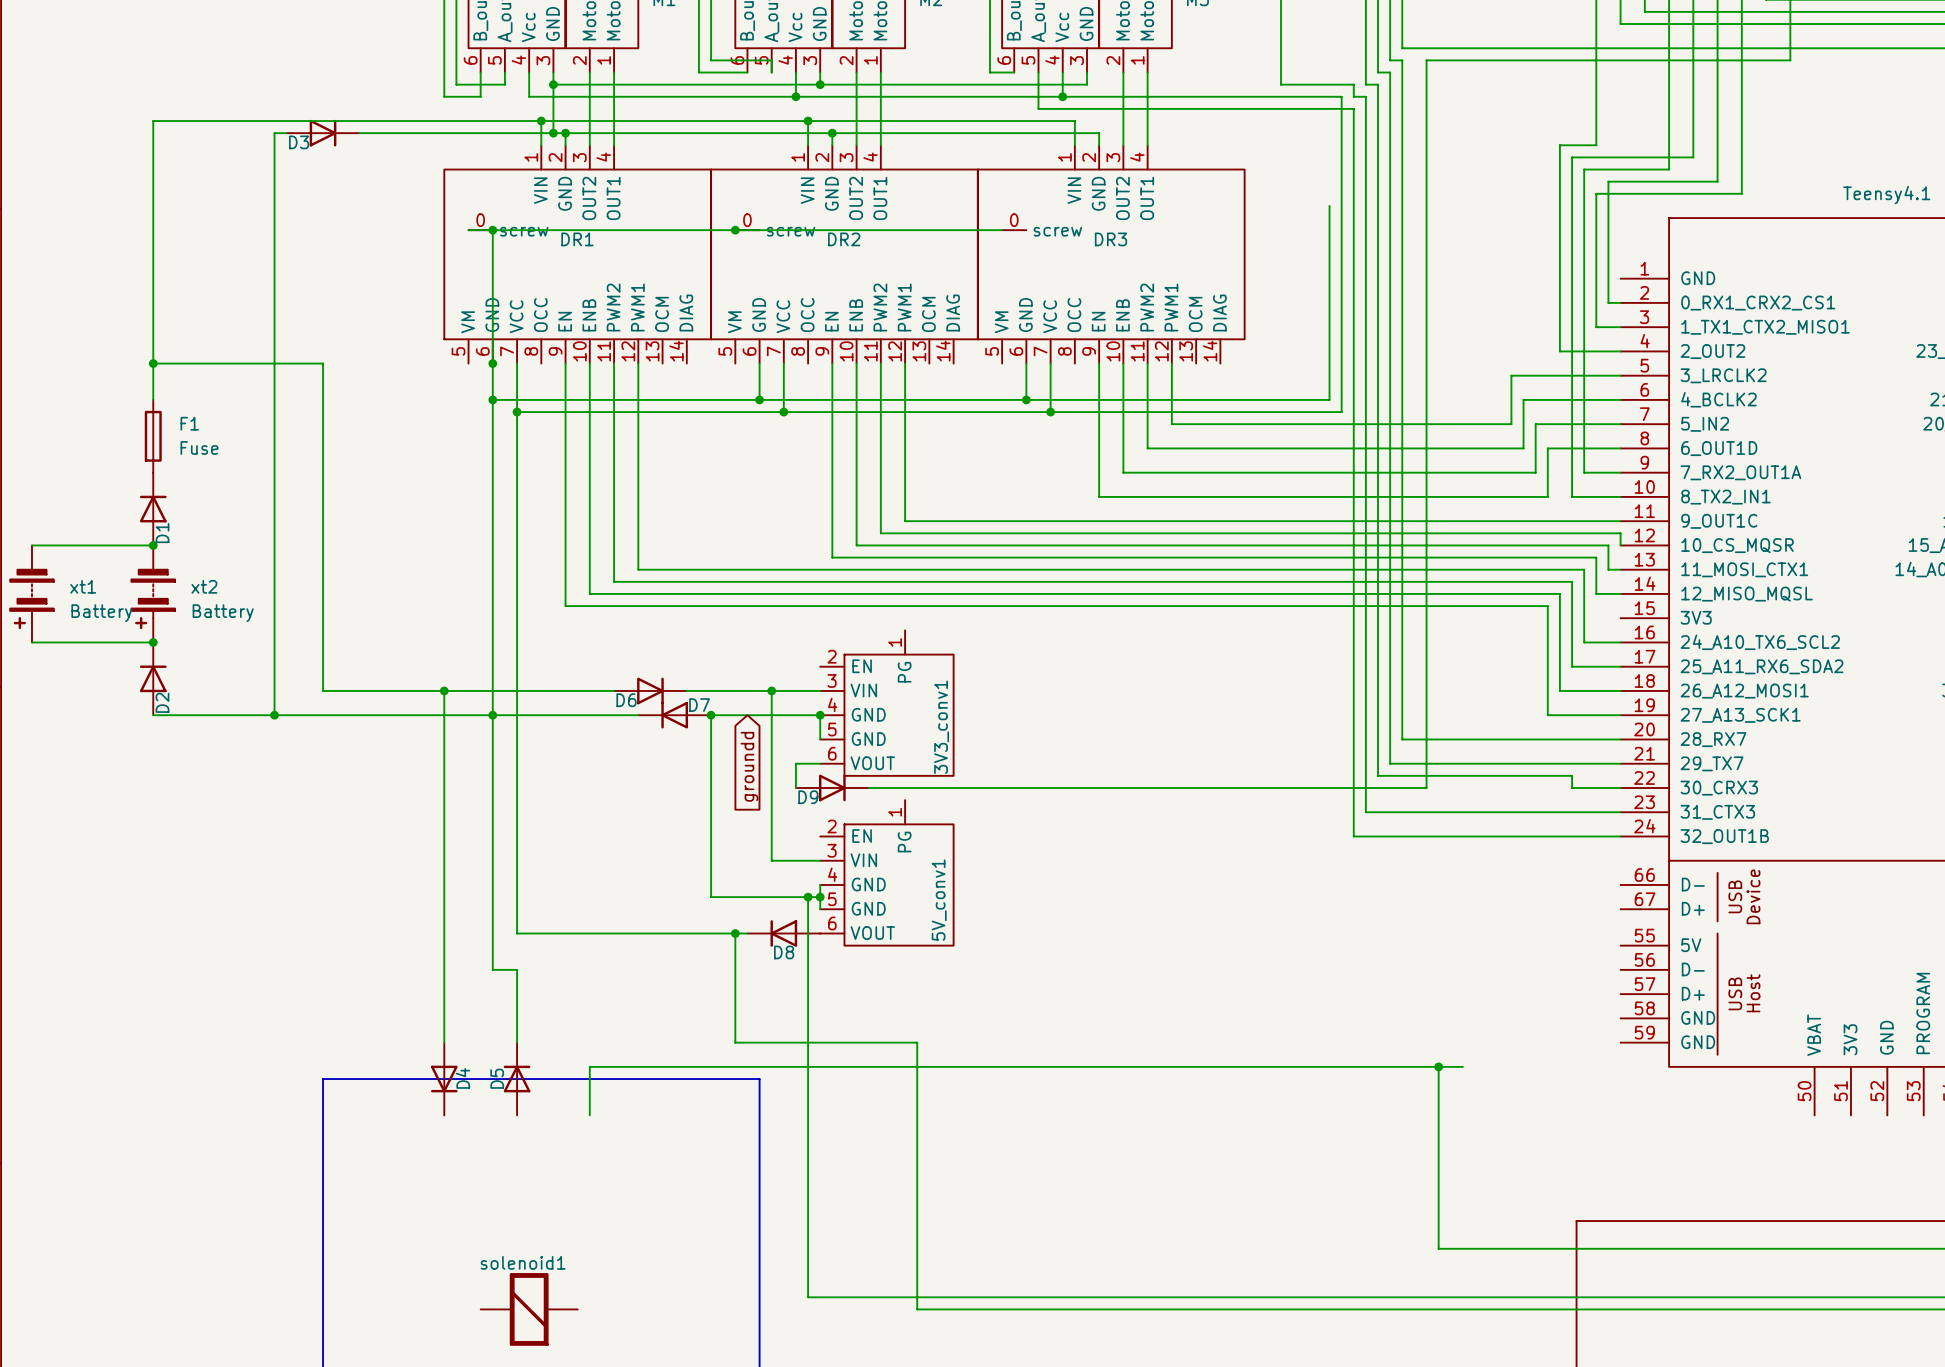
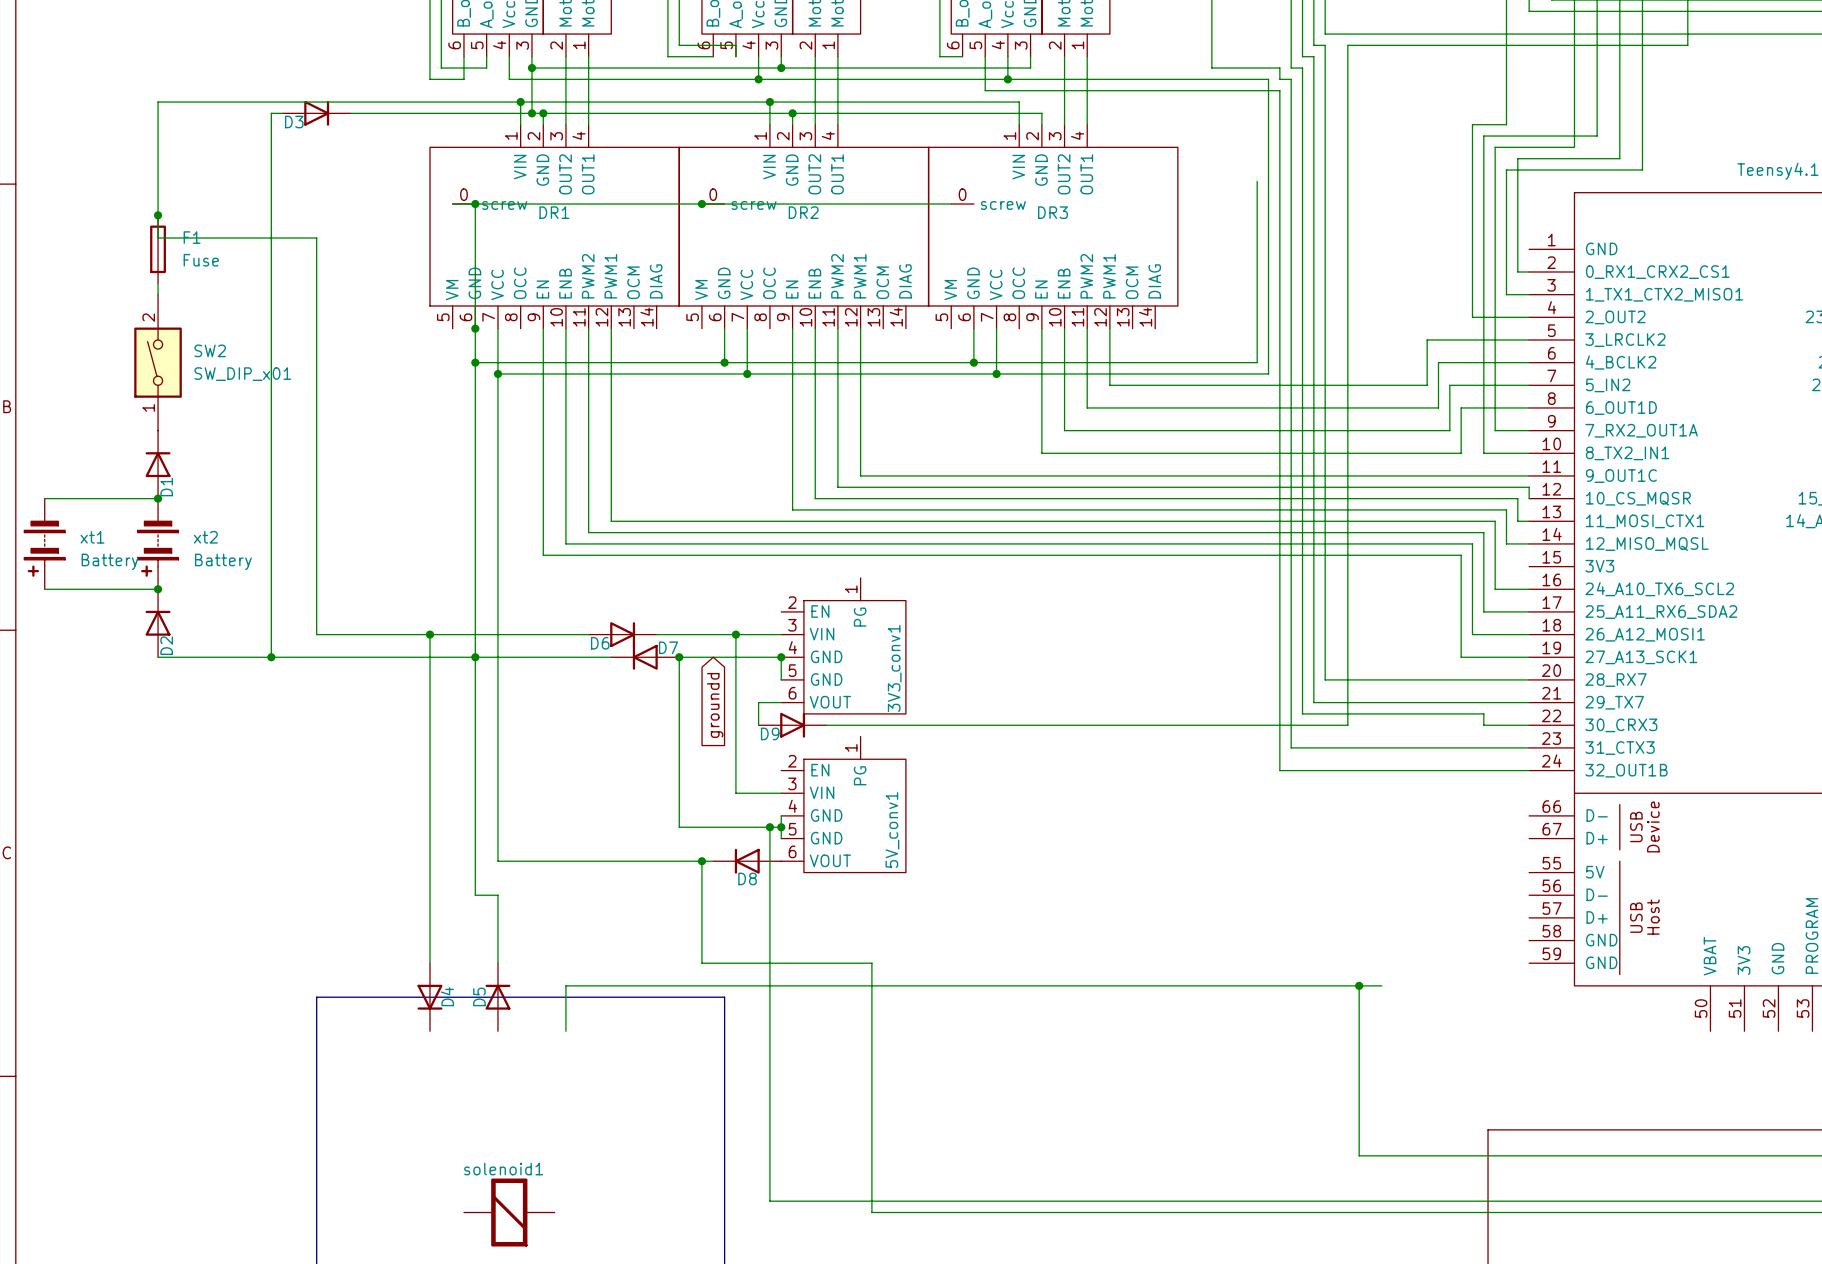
junction: none -> (158, 215)
wire: (153, 363) (323, 363) -> (158, 238) (316, 238) (316, 328)
junction: (153, 363) -> none
SW2: none -> SW_DIP_x01 (158, 362)
F1 position: (153, 436) -> (158, 249)

